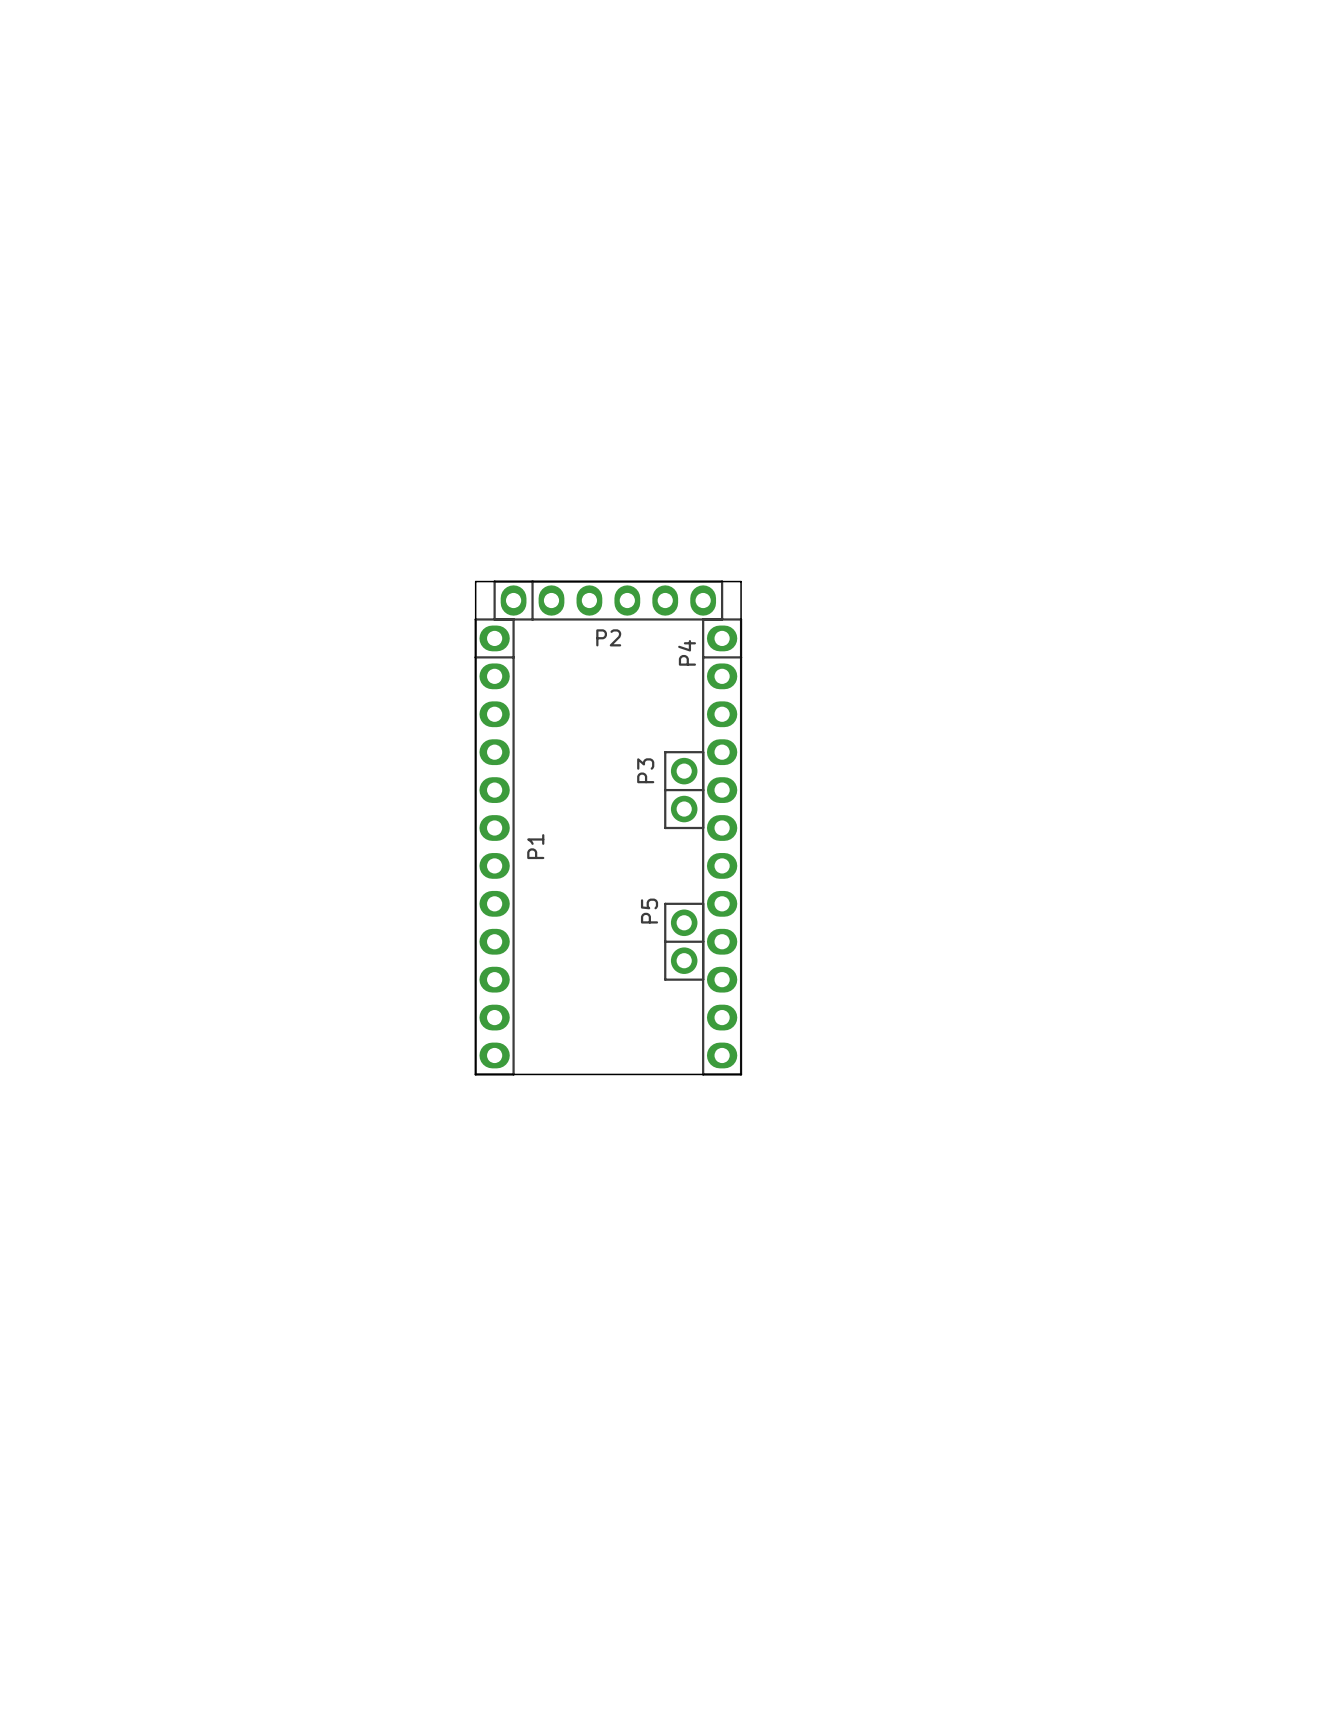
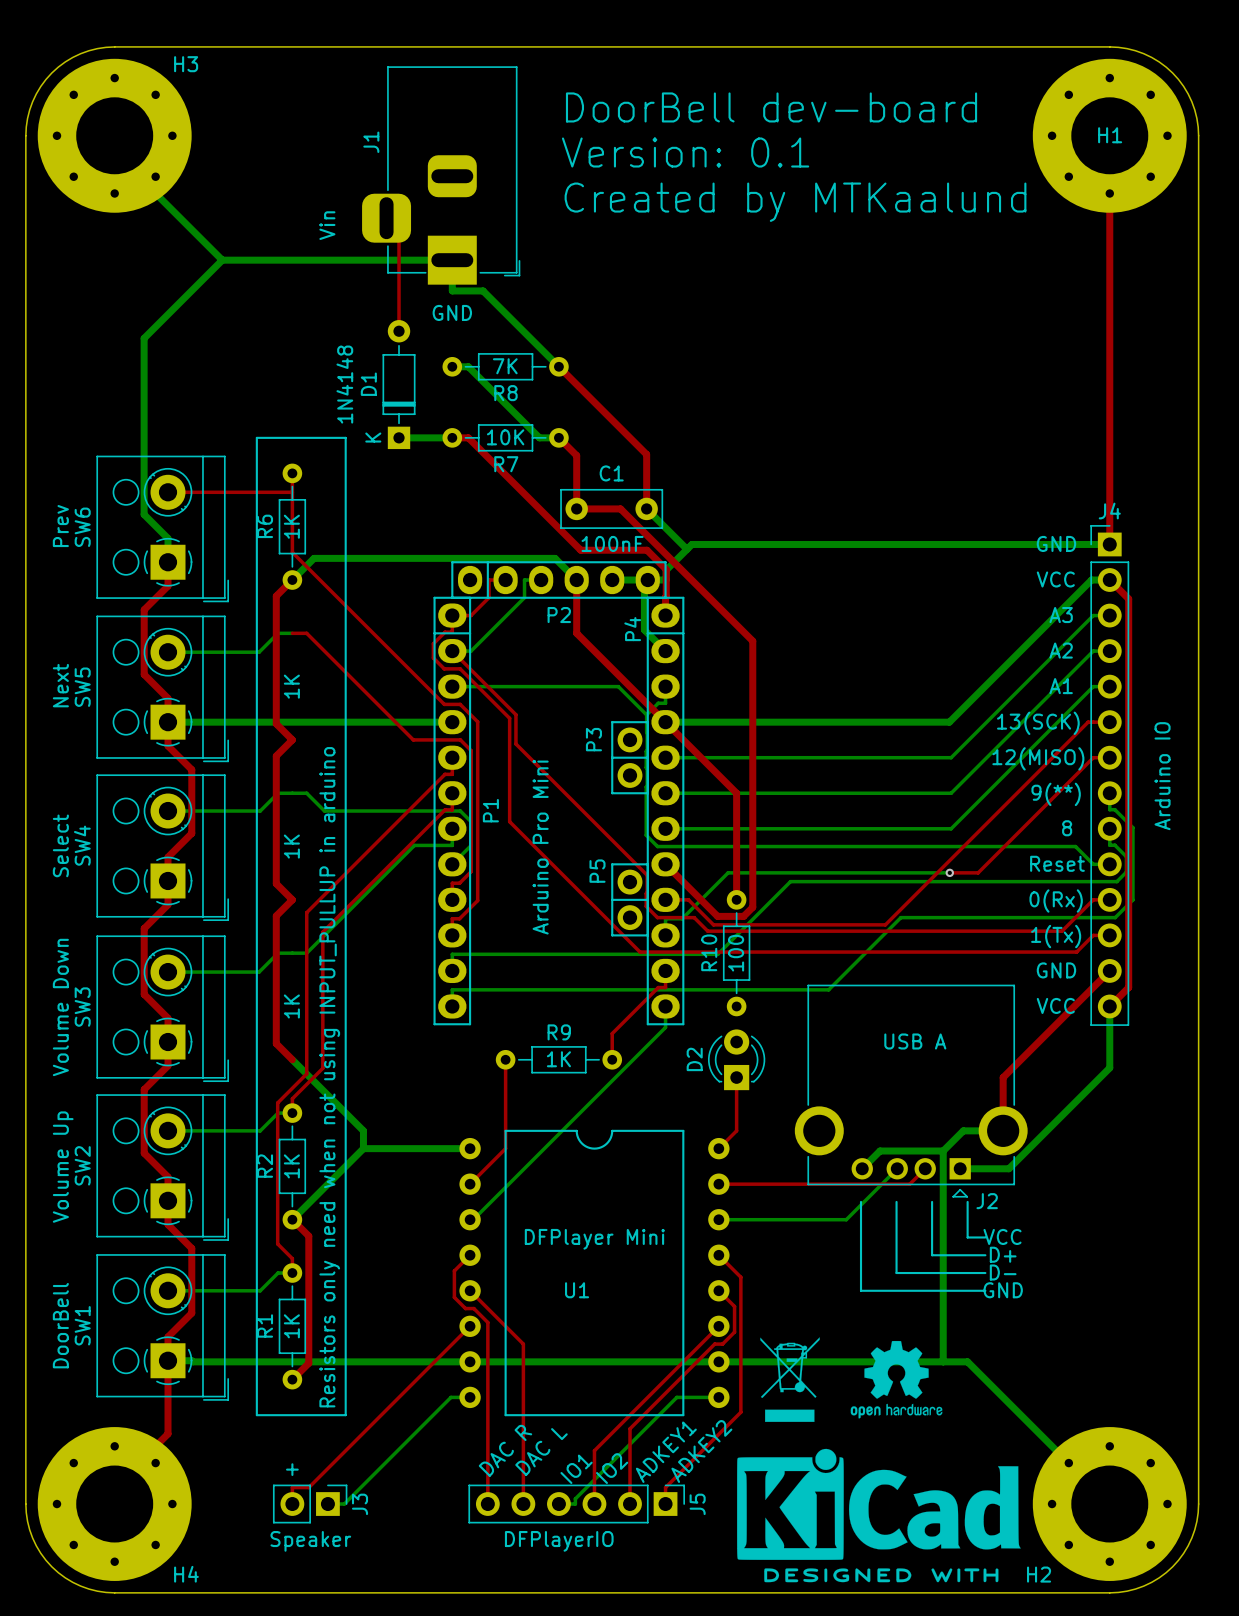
board edge: none -> (114, 46) (1109, 46) (1127, 48) (1151, 57) (1172, 72) (1183, 86) (1194, 109) (1198, 135) (1198, 1504) (1194, 1529) (1188, 1545) (1172, 1566) (1159, 1577) (1135, 1589) (1109, 1592) (114, 1592) (97, 1591) (72, 1582) (51, 1566) (40, 1553) (29, 1529) (25, 1504) (25, 135) (27, 118) (32, 101) (40, 86) (51, 72) (65, 61) (80, 53) (97, 48) (114, 46)
text: none -> DoorBell dev-board (771, 107)
H3: none -> (114, 135)
H1: none -> (1109, 135)
text: none -> Version: 0.1 (685, 152)
J1: none -> (441, 175)
bottom track: none -> (155, 193) (222, 260)
top track: none -> (1109, 193) (1109, 544)
text: none -> Created by MTKaalund (795, 202)
top track: none -> (386, 218) (399, 230) (399, 331)
text: none -> Vin (327, 225)
bottom track: none -> (222, 260) (452, 260) (452, 290) (483, 290) (558, 366)
bottom track: none -> (222, 260) (144, 338) (144, 514) (168, 538) (168, 562)
text: none -> GND (452, 312)
text: none -> 7K (505, 366)
bottom track: none -> (452, 366) (468, 366) (539, 437) (558, 437)
R8: none -> (505, 366)
top track: none -> (558, 366) (646, 454) (646, 508)
text: none -> 1N4148 (344, 384)
D1: none -> (399, 384)
line: none -> (256, 437) (256, 1415) (345, 1415) (345, 437) (256, 437)
bottom track: none -> (399, 437) (452, 437)
top track: none -> (452, 437) (468, 437) (580, 550) (647, 550) (666, 569) (665, 615)
R7: none -> (505, 437)
text: none -> 10K (505, 437)
top track: none -> (558, 437) (576, 455) (576, 508) (620, 508) (752, 641) (752, 907) (743, 916) (717, 916) (665, 864)
top track: none -> (292, 473) (292, 552) (444, 704) (460, 704) (477, 721) (477, 900) (459, 918) (452, 918) (452, 935)
top track: none -> (168, 492) (292, 492)
C1: none -> (611, 508)
bottom track: none -> (646, 508) (687, 549)
text: none -> Prev (60, 526)
text: none -> 1K (291, 526)
R6: none -> (292, 526)
SW6: none -> (162, 528)
text: none -> 100nF (612, 543)
text: none -> GND (1056, 543)
bottom track: none -> (1109, 544) (691, 544) (666, 570) (666, 580) (612, 580)
top track: none -> (168, 562) (168, 586) (144, 609) (144, 674) (168, 698) (168, 745) (191, 769) (191, 833) (168, 857) (168, 904) (144, 928) (144, 994) (168, 1018) (168, 1065) (144, 1089) (144, 1153) (168, 1177) (168, 1224) (191, 1248) (191, 1313) (168, 1336) (168, 1433) (155, 1446)
board edge: (475, 581) (741, 581) (741, 1074) (475, 1074) (475, 581) -> none
text: none -> VCC (1055, 579)
top track: none -> (292, 580) (276, 596) (276, 723) (292, 739) (276, 756) (276, 883) (292, 899) (276, 915) (276, 1043) (292, 1059)
bottom track: none -> (292, 580) (314, 558) (555, 558) (576, 580)
top track: none -> (505, 580) (488, 580) (488, 597) (471, 615) (452, 615) (452, 632) (445, 632) (433, 643) (433, 658) (444, 668) (460, 668) (509, 718) (509, 821) (640, 952) (1076, 952) (1093, 935) (1109, 935)
bottom track: none -> (541, 580) (524, 580) (524, 597) (471, 651) (452, 651)
top track: none -> (576, 580) (576, 633) (736, 793) (736, 899)
bottom track: none -> (644, 580) (644, 629) (665, 651)
top track: none -> (1109, 580) (1128, 598) (1128, 987) (1109, 1006)
bottom track: none -> (1109, 580) (1091, 580) (949, 722) (665, 722)
text: none -> A3 (1061, 615)
bottom track: none -> (1109, 615) (1093, 615) (951, 757) (665, 757)
top track: none -> (292, 633) (306, 633) (413, 739) (460, 739) (471, 750) (471, 871) (459, 883) (452, 883) (452, 899)
bottom track: none -> (292, 633) (278, 633) (259, 652) (168, 652)
text: none -> A2 (1061, 650)
top track: none -> (452, 651) (515, 714) (515, 744) (647, 875) (646, 906) (657, 917) (694, 917) (707, 931) (1062, 931) (1093, 899) (1109, 899)
bottom track: none -> (1109, 651) (1093, 651) (951, 793) (665, 793)
text: none -> Next (60, 685)
text: none -> A1 (1061, 686)
text: none -> 1K (291, 686)
bottom track: none -> (452, 686) (618, 686) (646, 714)
bottom track: none -> (665, 686) (665, 703) (658, 703) (646, 714)
bottom track: none -> (1109, 686) (1093, 686) (951, 828) (665, 828)
SW5: none -> (162, 688)
bottom track: none -> (646, 714) (646, 835) (657, 846) (1075, 846) (1093, 864) (1109, 864)
bottom track: none -> (168, 722) (452, 722)
top track: none -> (1109, 722) (1088, 722) (885, 924) (713, 924) (688, 899) (665, 899)
text: none -> 13(SCK) (1038, 723)
top track: none -> (452, 757) (452, 774) (445, 774) (306, 912) (306, 1073) (277, 1102) (277, 1243) (292, 1258) (292, 1273)
top track: none -> (1109, 757) (1093, 757) (978, 872) (949, 872)
text: none -> 12(MISO) (1038, 758)
J4: none -> (1109, 775)
text: none -> Arduino IO (1162, 776)
top track: none -> (452, 793) (452, 809) (445, 809) (322, 932) (322, 1068) (292, 1098) (292, 1113)
bottom track: none -> (1109, 793) (1109, 809) (1114, 809) (1132, 827) (1132, 899) (1115, 917) (900, 917) (828, 989) (452, 989) (452, 1006)
text: none -> 9(**) (1056, 794)
bottom track: none -> (168, 811) (260, 811) (278, 793) (306, 793) (324, 811) (460, 811) (471, 821) (471, 845) (452, 864)
bottom track: none -> (452, 828) (452, 845) (414, 845) (306, 953) (278, 953) (259, 972) (168, 972)
text: none -> 8 (1067, 828)
bottom track: none -> (1109, 828) (1109, 845) (1114, 845) (1126, 856) (1126, 872) (1116, 881) (790, 881) (717, 954) (452, 954) (452, 970)
text: none -> Select (60, 845)
text: none -> 1K (291, 846)
text: none -> Arduino Pro Mini (540, 847)
SW4: none -> (162, 847)
text: none -> Reset (1057, 863)
bottom track: none -> (949, 872) (728, 872) (682, 918) (665, 918) (665, 935)
via: none -> (949, 872)
text: none -> 0(Rx) (1056, 901)
text: none -> 1(Tx) (1056, 936)
R10: none -> (736, 953)
text: none -> 100 (736, 953)
top track: none -> (665, 970) (665, 987) (658, 987) (612, 1033) (612, 1059)
text: none -> GND (1056, 970)
top track: none -> (1109, 970) (1003, 1077) (1003, 1130)
text: none -> VCC (1055, 1005)
text: none -> 1K (291, 1006)
bottom track: none -> (665, 1006) (665, 1027) (473, 1219) (470, 1219)
bottom track: none -> (1109, 1006) (1109, 1067) (1008, 1168) (960, 1168)
text: none -> Volume Down (60, 1007)
SW3: none -> (162, 1008)
text: none -> USB A (915, 1041)
text: none -> 1K (558, 1059)
bottom track: none -> (292, 1059) (363, 1130) (363, 1148)
top track: none -> (505, 1059) (505, 1148) (470, 1184)
R9: none -> (558, 1059)
D2: none -> (736, 1059)
text: none -> Resistors only need when not using INPUT_PULLUP in arduino (329, 1077)
top track: none -> (736, 1077) (736, 1130) (718, 1148)
J2: none -> (911, 1091)
bottom track: none -> (292, 1113) (278, 1113) (260, 1130) (168, 1130)
line: none -> (505, 1130) (576, 1130) (581, 1143) (594, 1148) (607, 1143) (612, 1130) (683, 1130) (683, 1415) (505, 1415) (505, 1130)
bottom track: none -> (1003, 1130) (963, 1130) (943, 1151)
bottom track: none -> (363, 1148) (292, 1219)
bottom track: none -> (363, 1148) (470, 1148)
bottom track: none -> (943, 1151) (880, 1151) (862, 1168)
bottom track: none -> (943, 1151) (943, 1361)
text: none -> Volume Up (63, 1167)
text: none -> 1K (291, 1166)
R2: none -> (292, 1166)
SW2: none -> (162, 1167)
bottom track: none -> (897, 1168) (846, 1219) (718, 1219)
top track: none -> (925, 1168) (909, 1184) (718, 1184)
line: none -> (861, 1201) (861, 1290) (985, 1290)
line: none -> (896, 1201) (896, 1273) (985, 1273)
line: none -> (932, 1201) (932, 1255) (985, 1255)
line: none -> (967, 1201) (967, 1237) (985, 1237)
top track: none -> (292, 1219) (308, 1236) (308, 1363) (292, 1379)
text: none -> VCC (1002, 1236)
text: none -> DFPlayer Mini (594, 1239)
top track: none -> (470, 1255) (454, 1270) (454, 1297) (465, 1308) (473, 1308) (487, 1322) (487, 1504)
top track: none -> (718, 1255) (740, 1277) (740, 1412) (665, 1487) (665, 1504)
text: none -> D+ (1003, 1254)
bottom track: none -> (292, 1273) (278, 1273) (260, 1290) (168, 1290)
U1: none -> (594, 1273)
text: none -> D- (1003, 1272)
top track: none -> (470, 1290) (523, 1344) (523, 1504)
top track: none -> (718, 1290) (734, 1306) (734, 1332) (722, 1344) (714, 1344) (630, 1428) (630, 1504)
text: none -> GND (1003, 1290)
text: none -> DoorBell (60, 1325)
text: none -> 1K (291, 1326)
R1: none -> (292, 1326)
top track: none -> (470, 1326) (308, 1487) (292, 1487) (292, 1504)
top track: none -> (718, 1326) (594, 1450) (594, 1504)
SW1: none -> (162, 1327)
drawing: none -> [760, 1337, 820, 1422]
drawing: none -> [850, 1340, 943, 1419]
bottom track: none -> (168, 1360) (967, 1361) (1068, 1463)
bottom track: none -> (470, 1397) (450, 1397) (344, 1504) (327, 1504)
bottom track: none -> (718, 1397) (676, 1397) (575, 1498) (575, 1504) (558, 1504)
drawing: none -> [737, 1448, 1021, 1583]
text: none -> DAC R (505, 1450)
text: none -> DAC L (541, 1451)
text: none -> ADKEY2 (701, 1451)
text: none -> ADKEY1 (666, 1452)
text: none -> IO2 (612, 1468)
text: none -> + (292, 1469)
text: none -> IO1 (576, 1469)
H4: none -> (114, 1504)
J3: none -> (310, 1504)
J5: none -> (576, 1504)
H2: none -> (1109, 1504)
text: none -> Speaker (310, 1541)
text: none -> DFPlayerIO (559, 1541)

